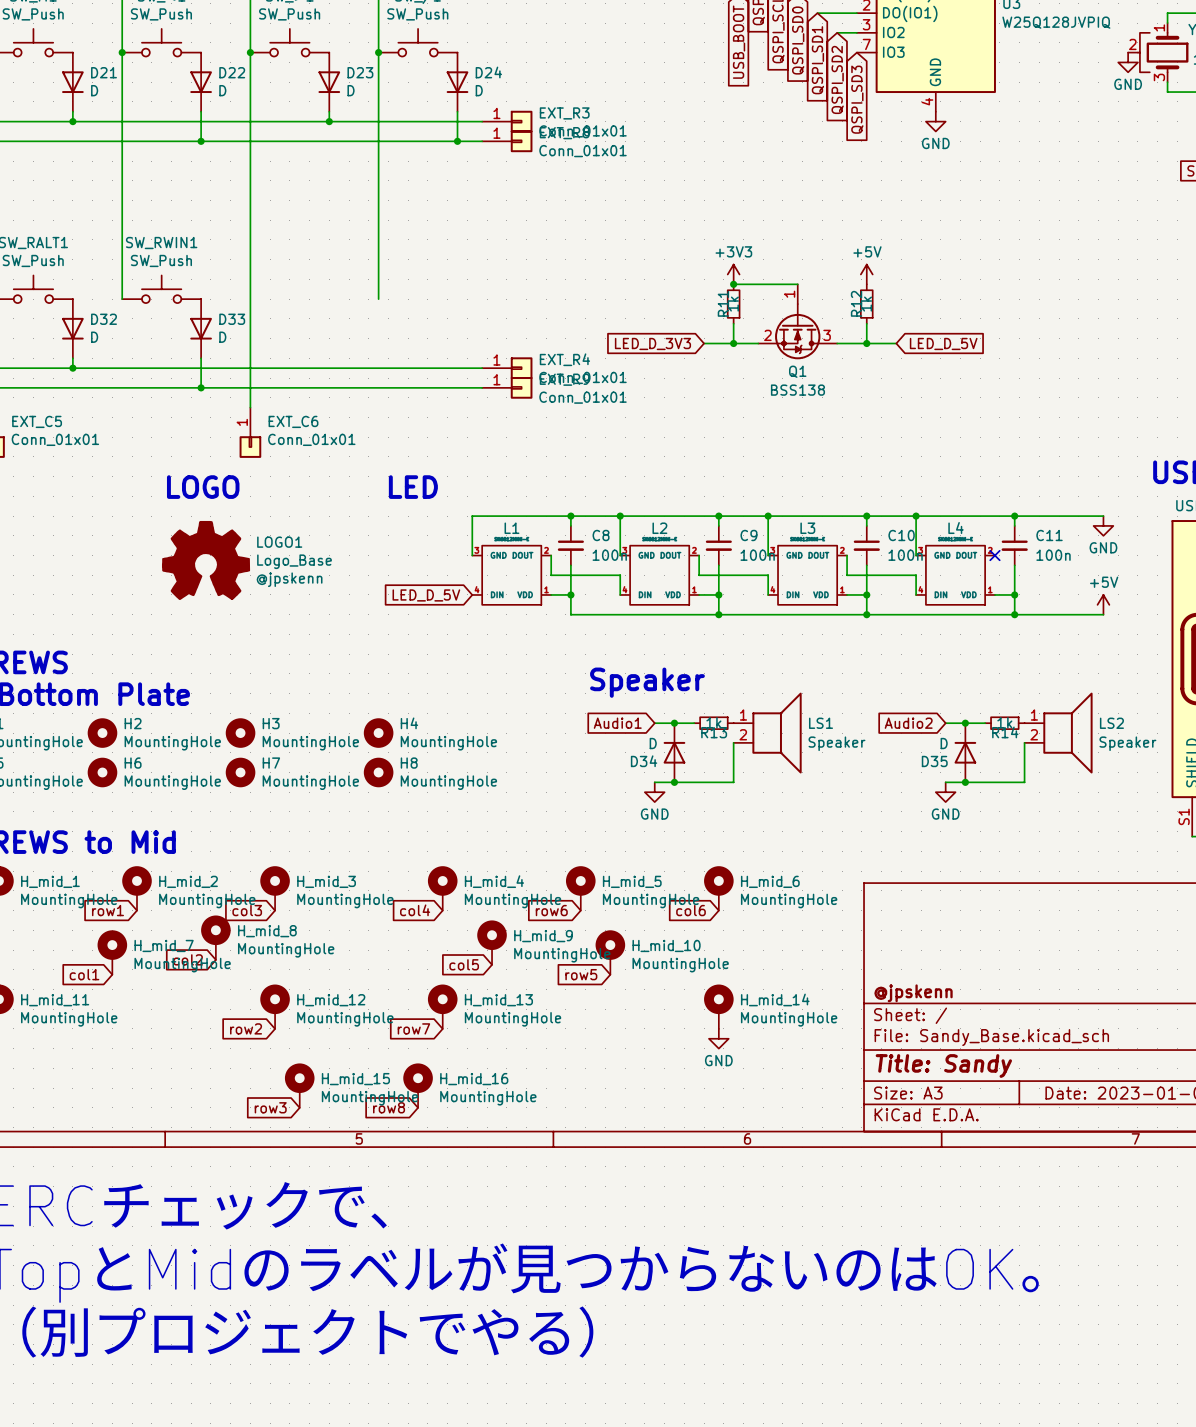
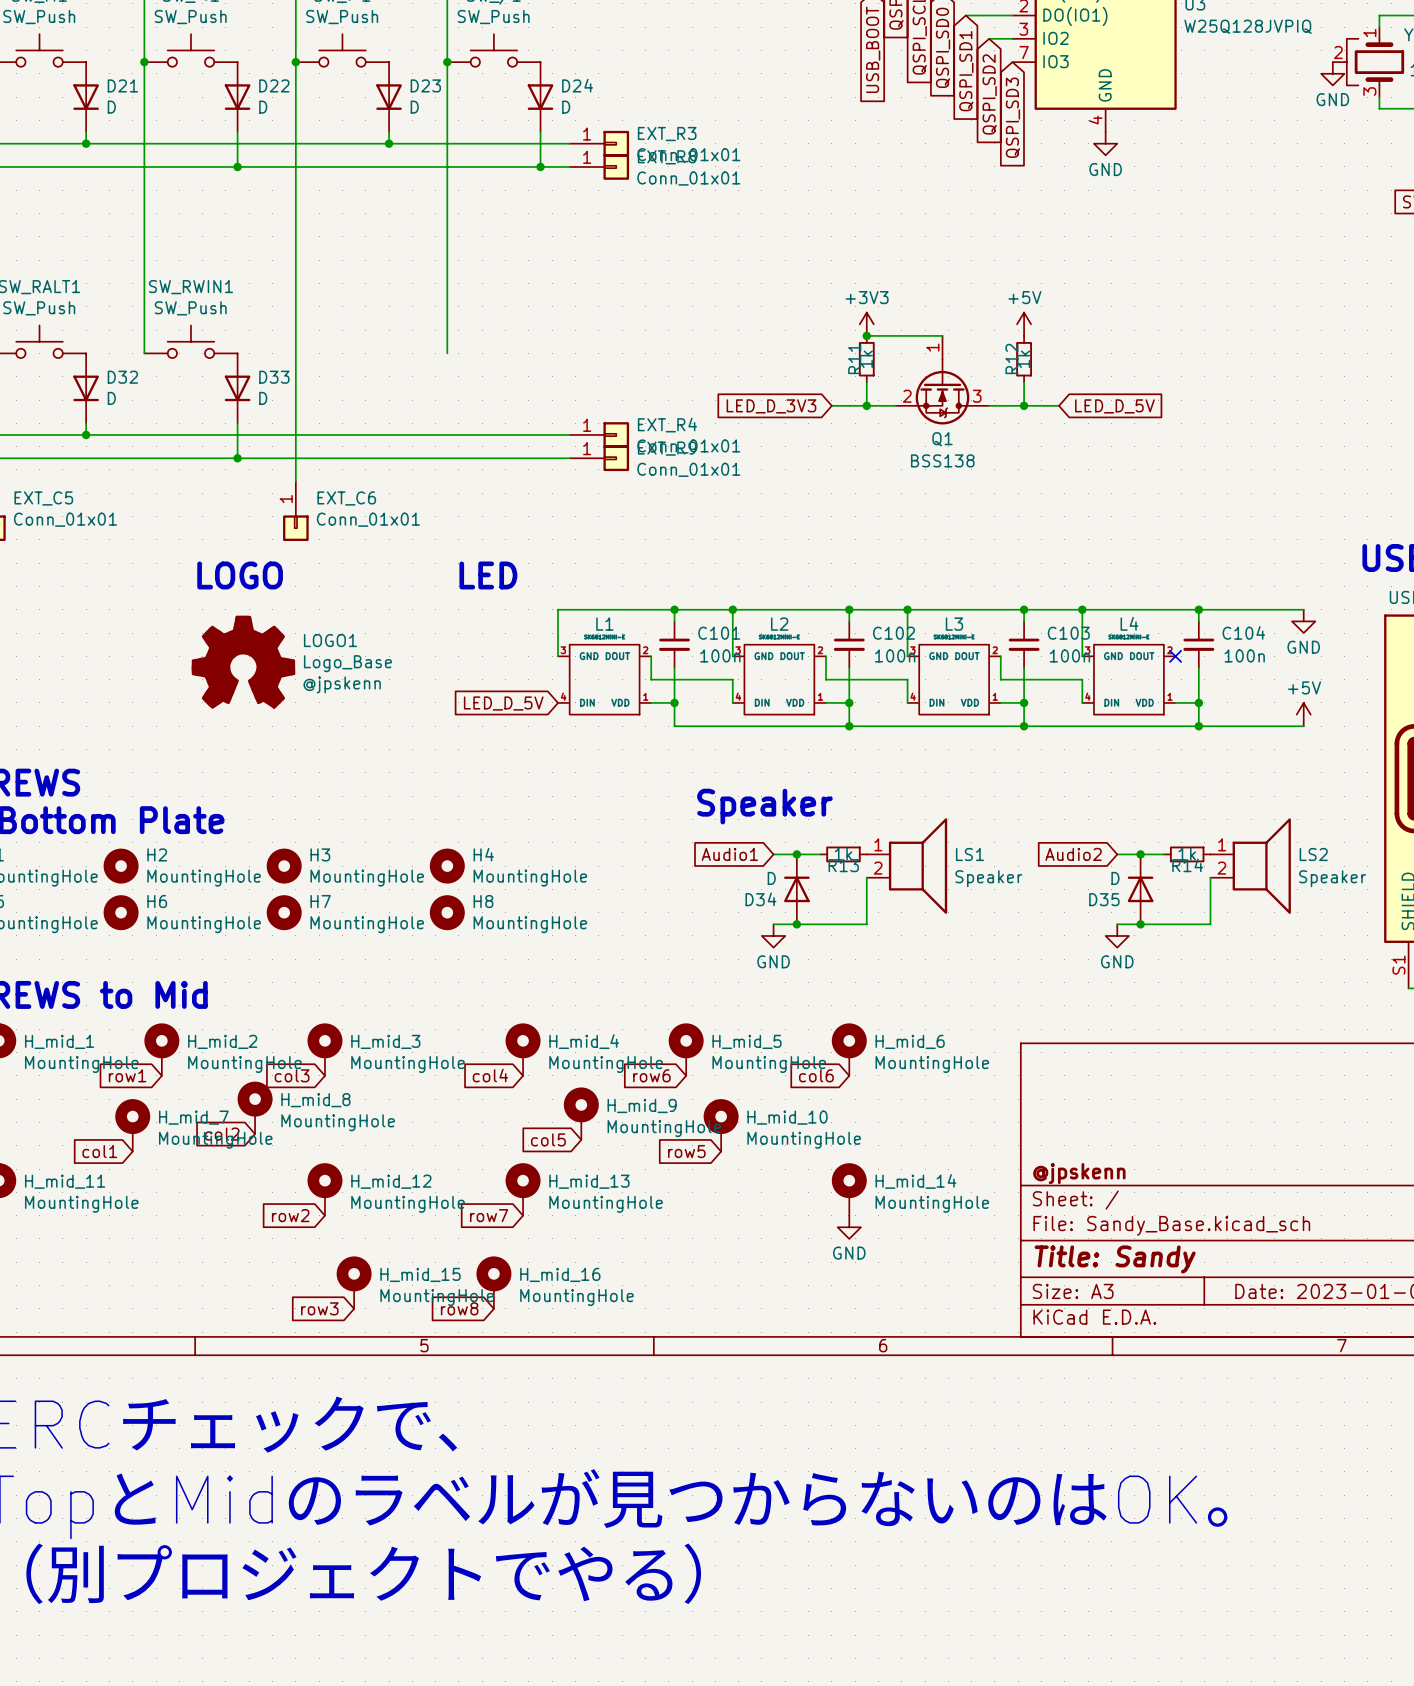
C8 name: C8 (601, 535) -> C101 (719, 633)
C9 name: C9 (748, 535) -> C102 (894, 633)
C10 name: C10 (901, 535) -> C103 (1068, 633)
C11 name: C11 (1049, 535) -> C104 (1243, 632)

